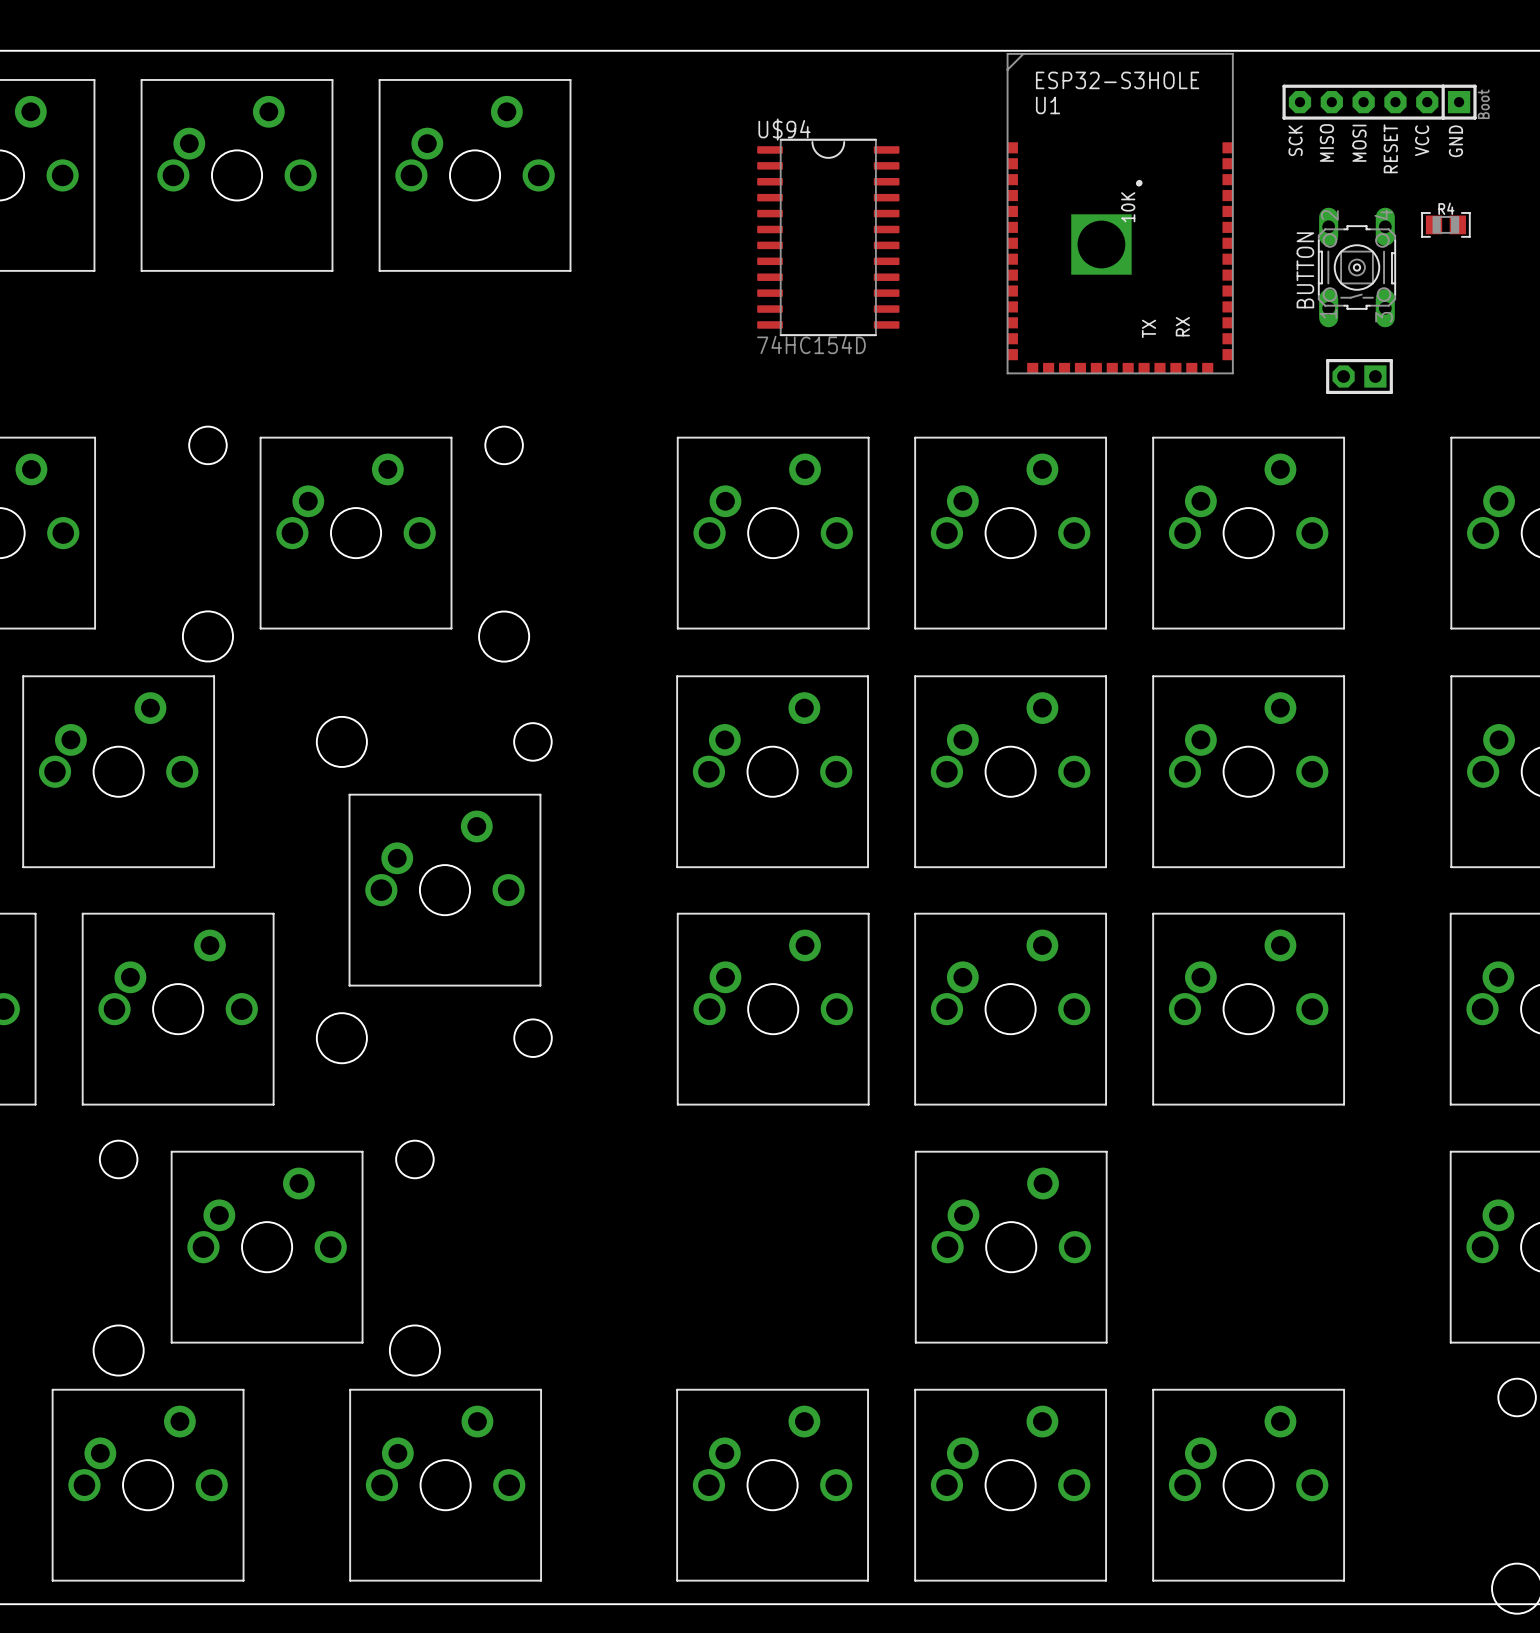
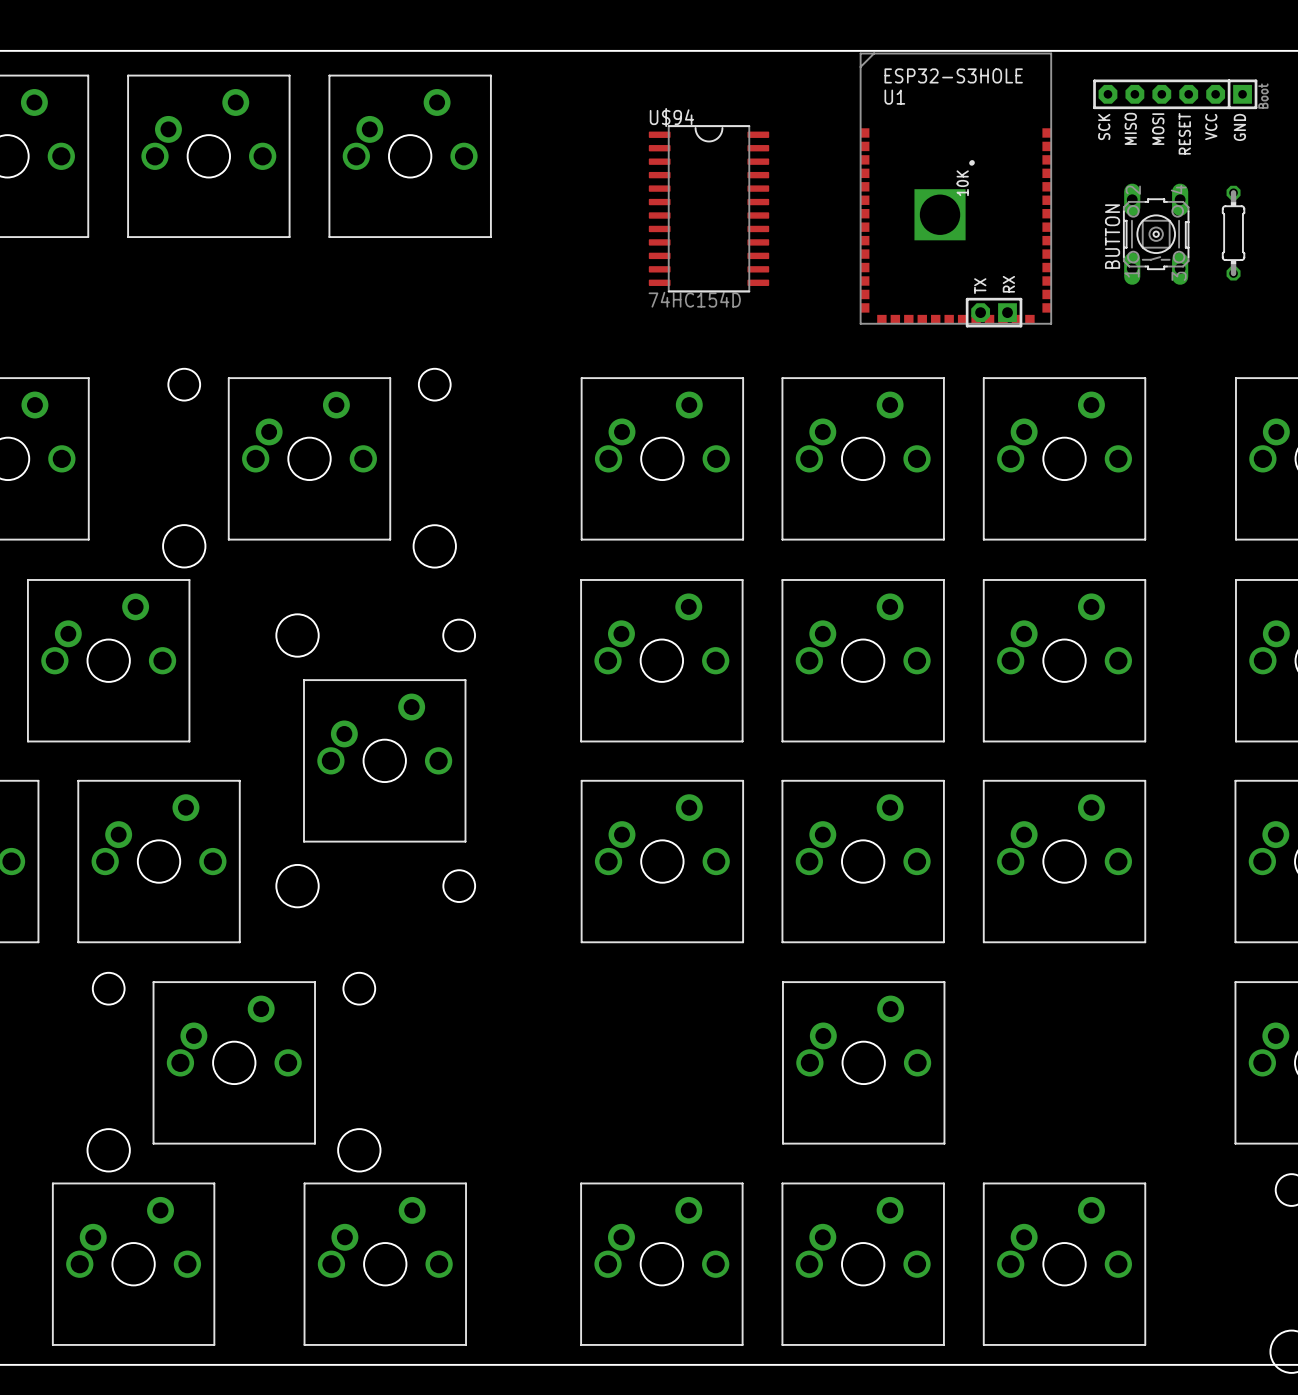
R4: (1445, 224) -> none
part: none -> (1233, 233)
part position: (1359, 376) -> (994, 312)

